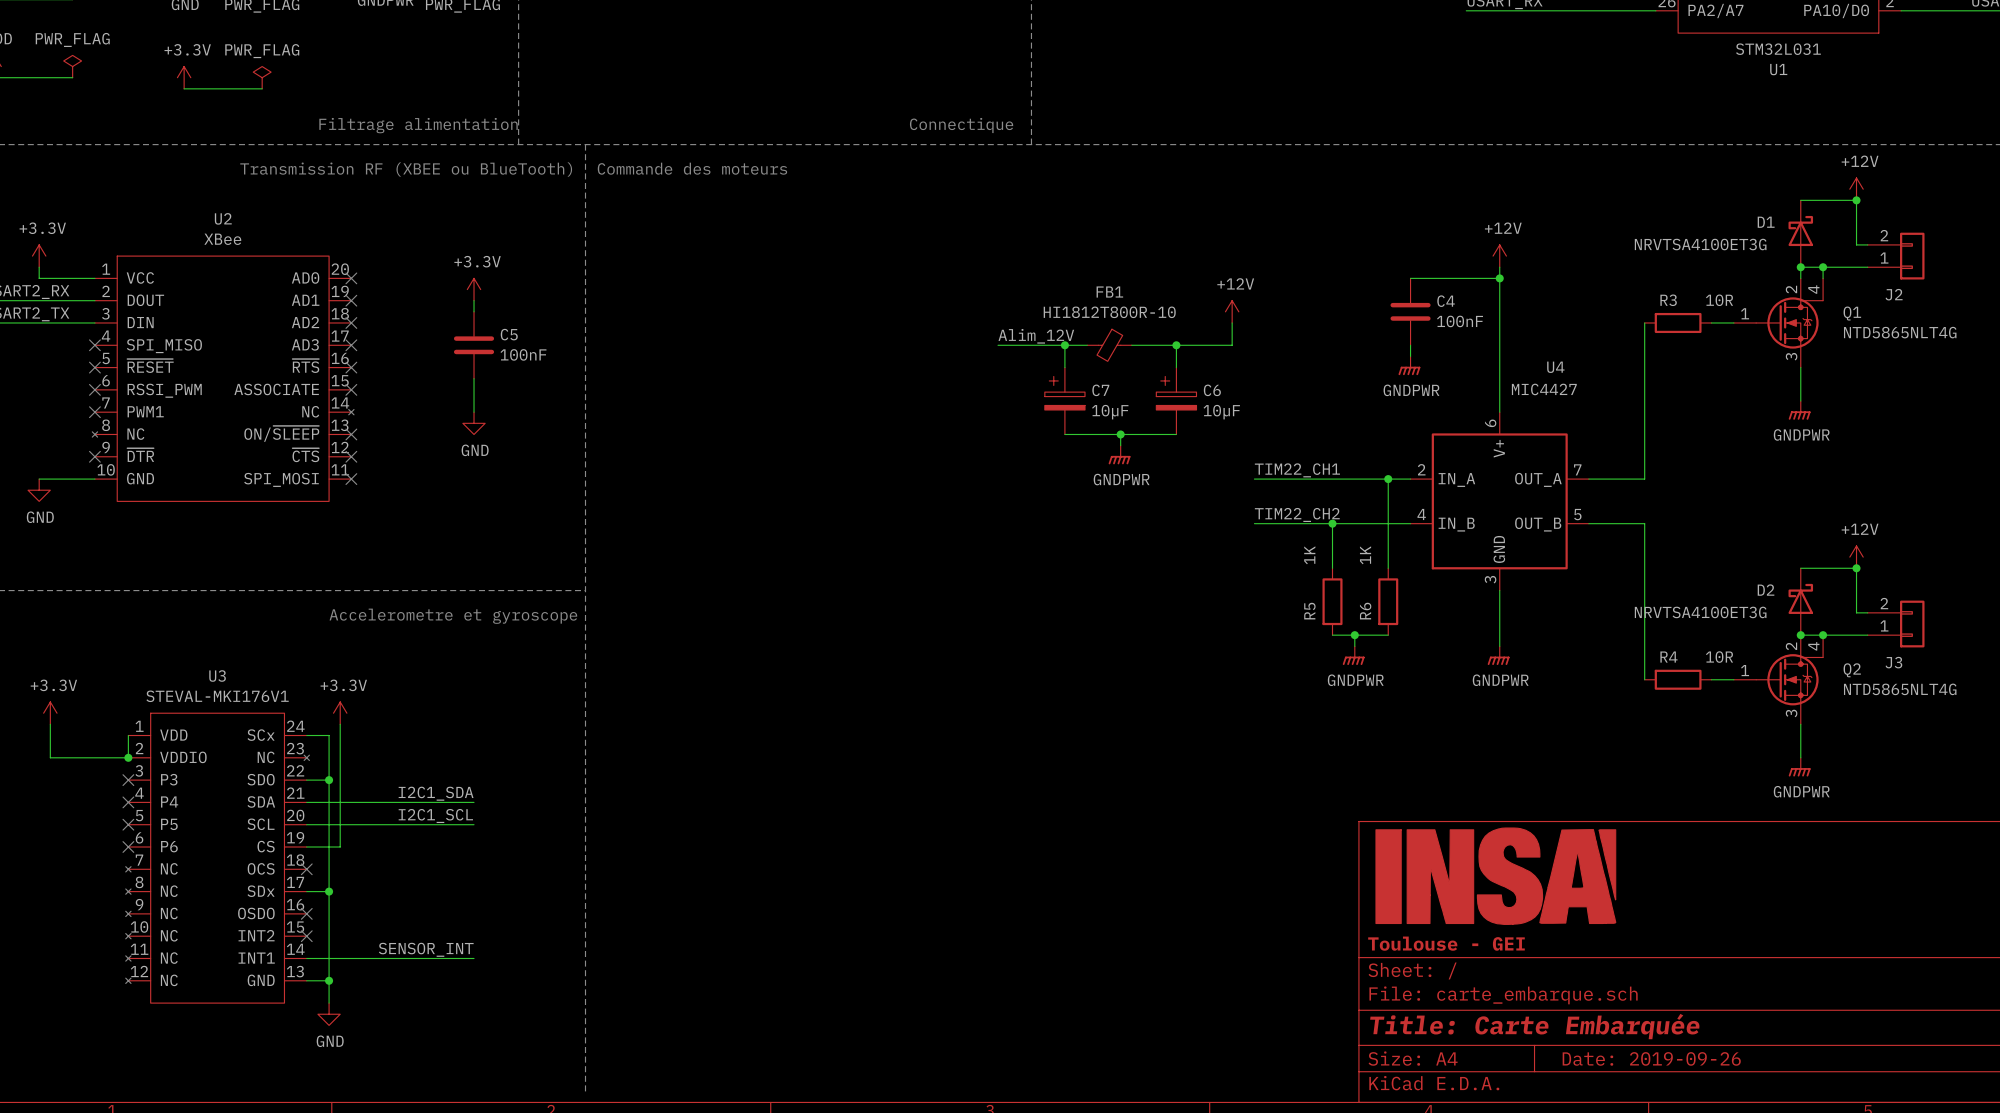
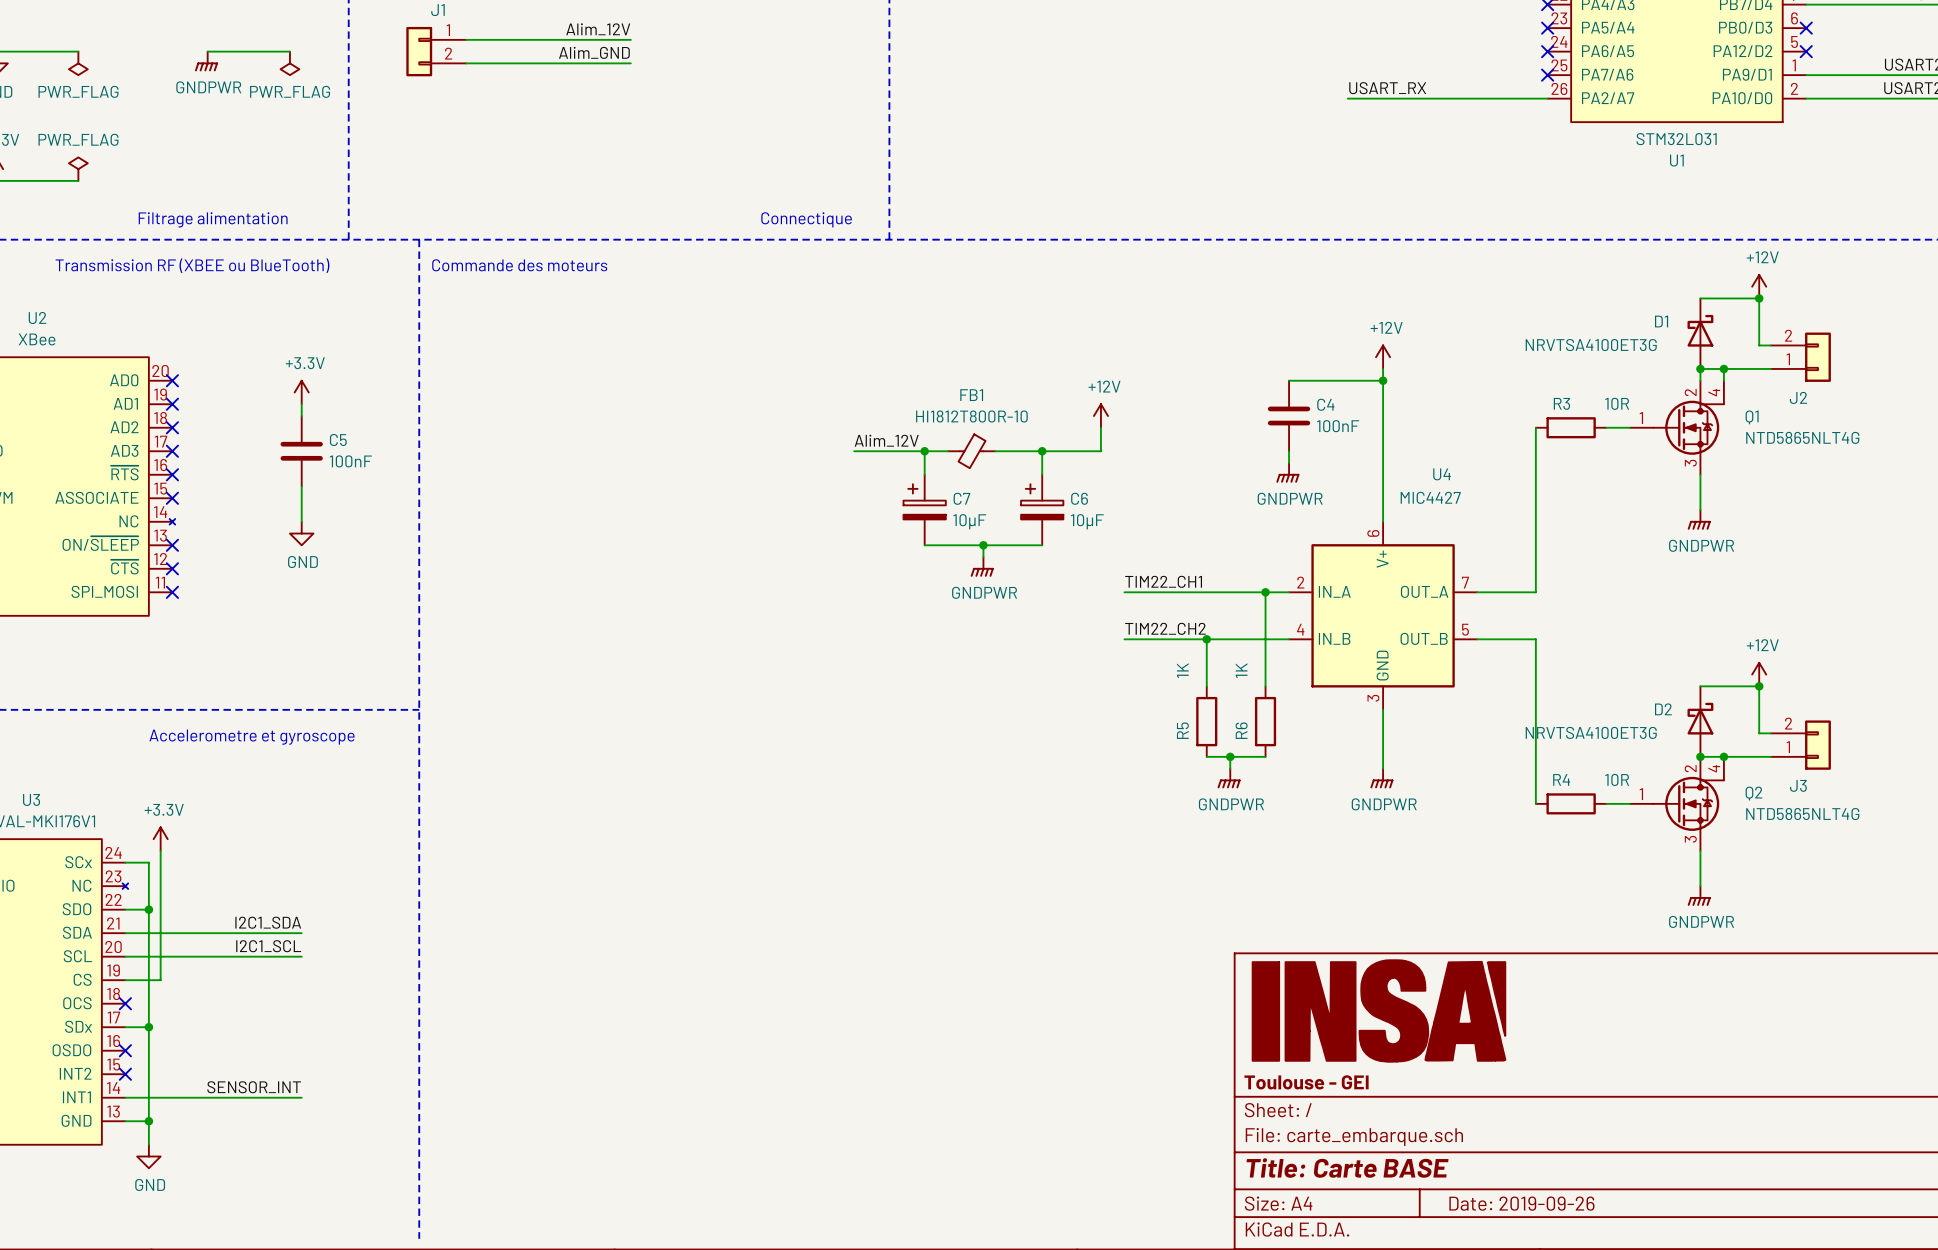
title block: Title: Carte Embarquée (1534, 1026) -> Title: Carte BASE (1347, 1167)

